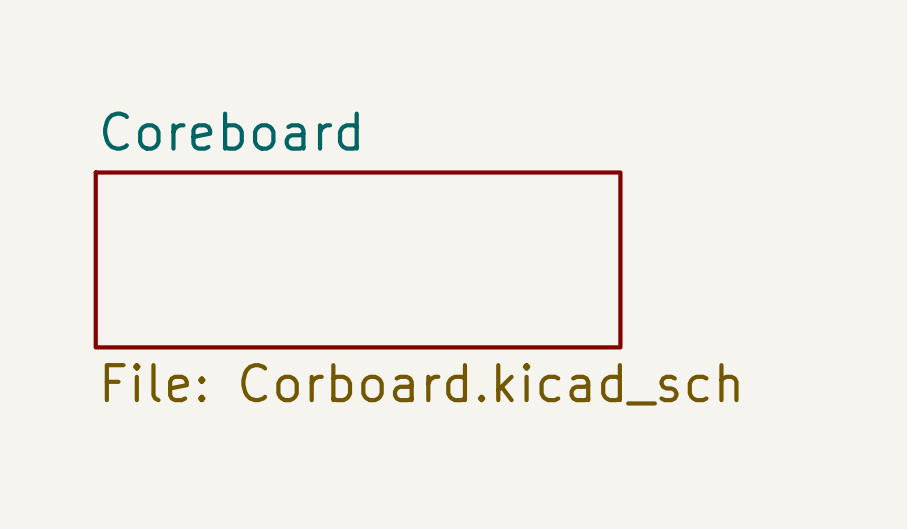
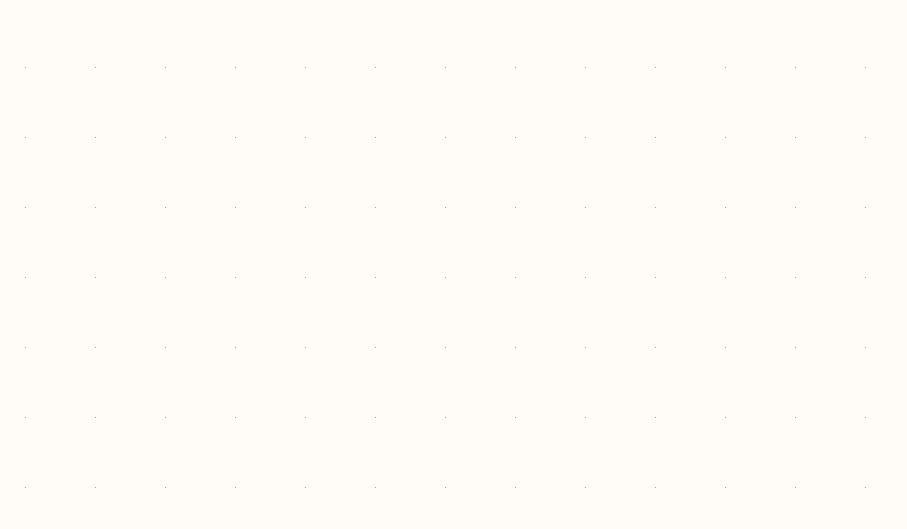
sheet Coreboard: File: Corboard.kicad_sch (358, 259) -> none

